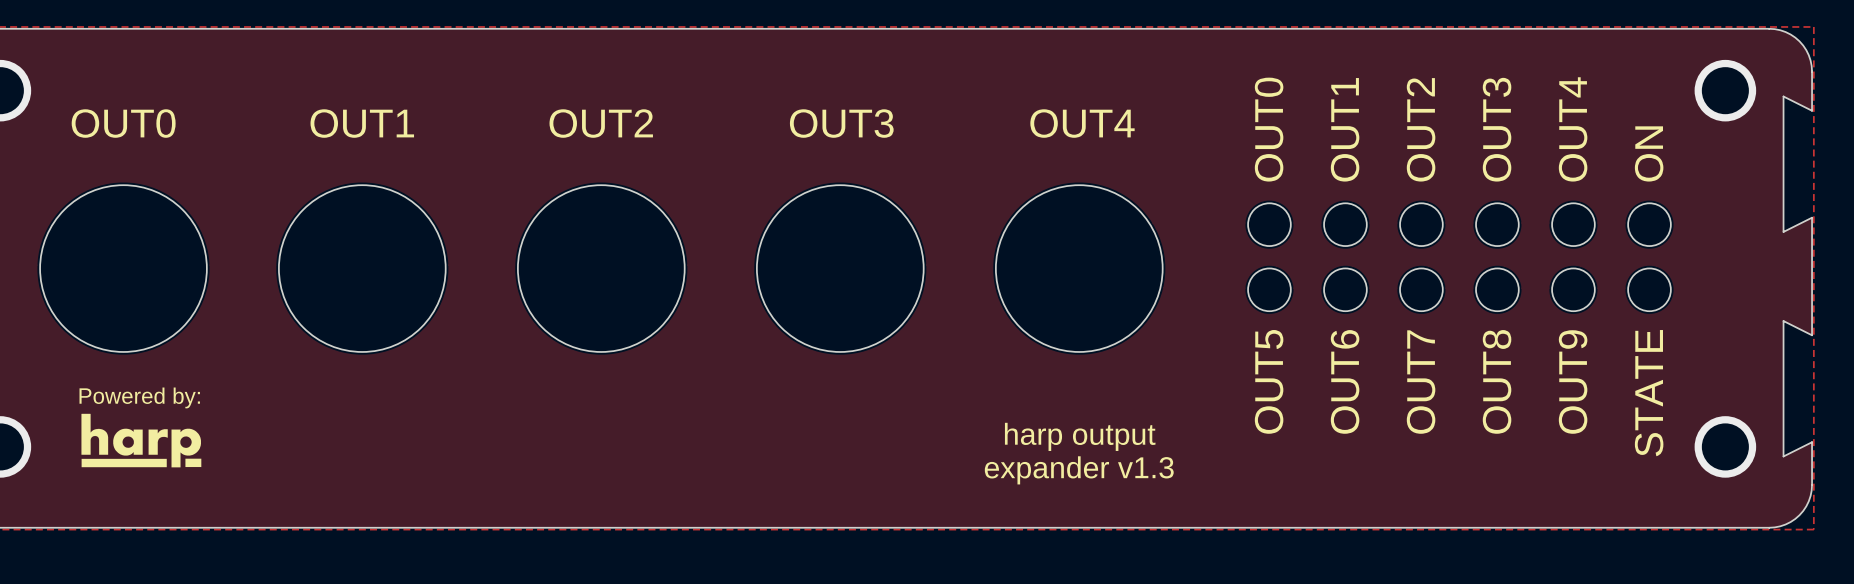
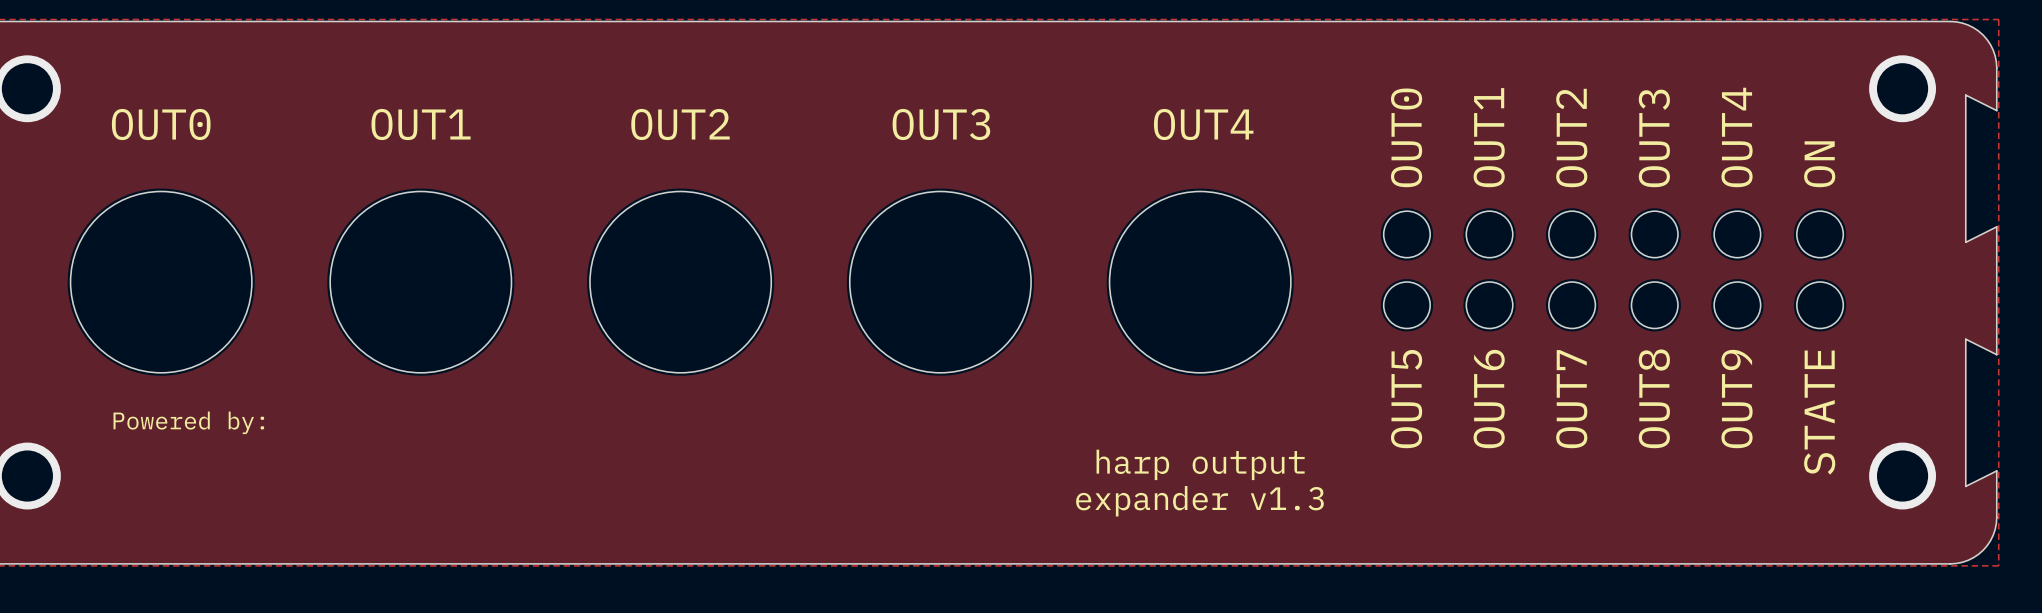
text: none -> Powered by: (188, 422)
drawing: [81, 413, 202, 468] -> none

